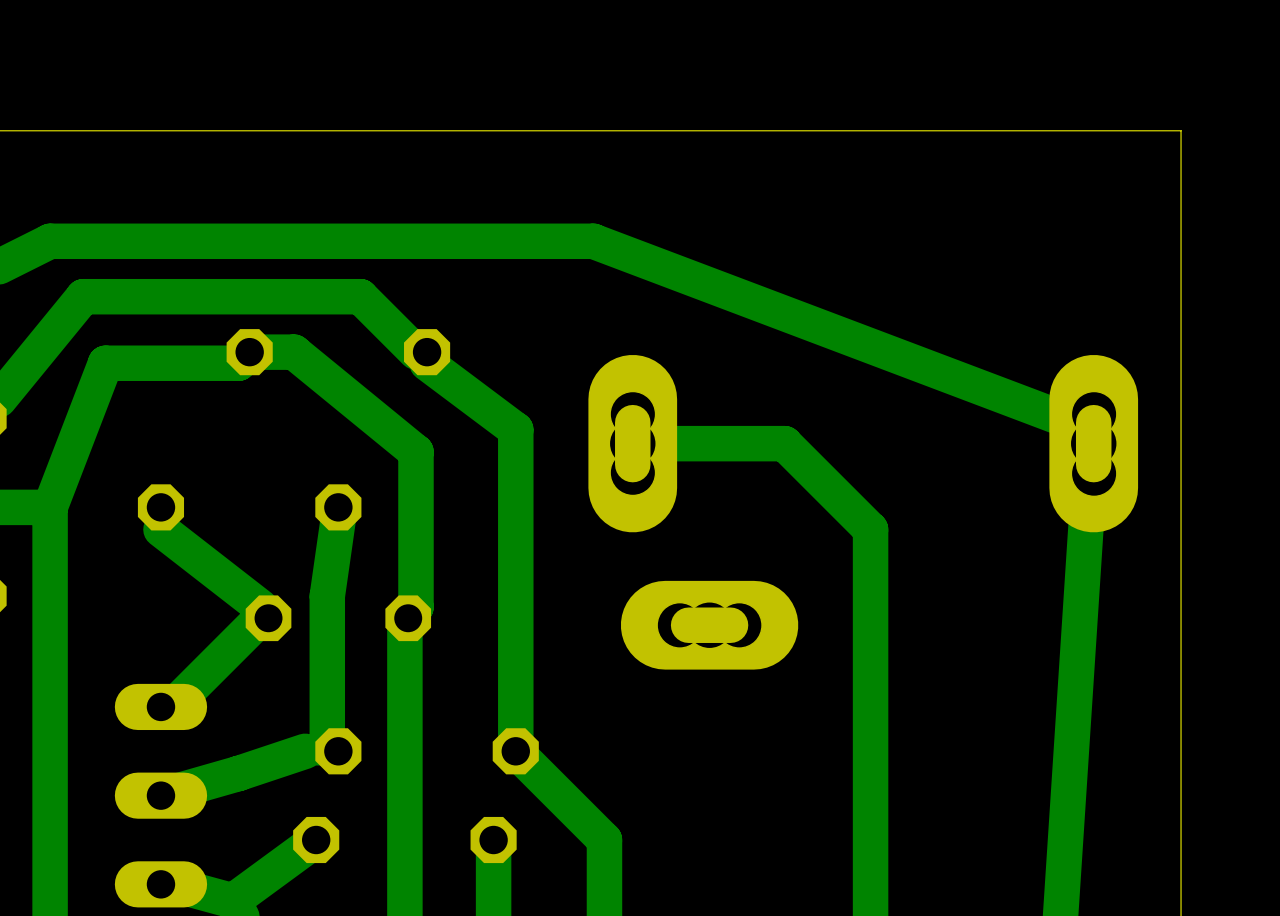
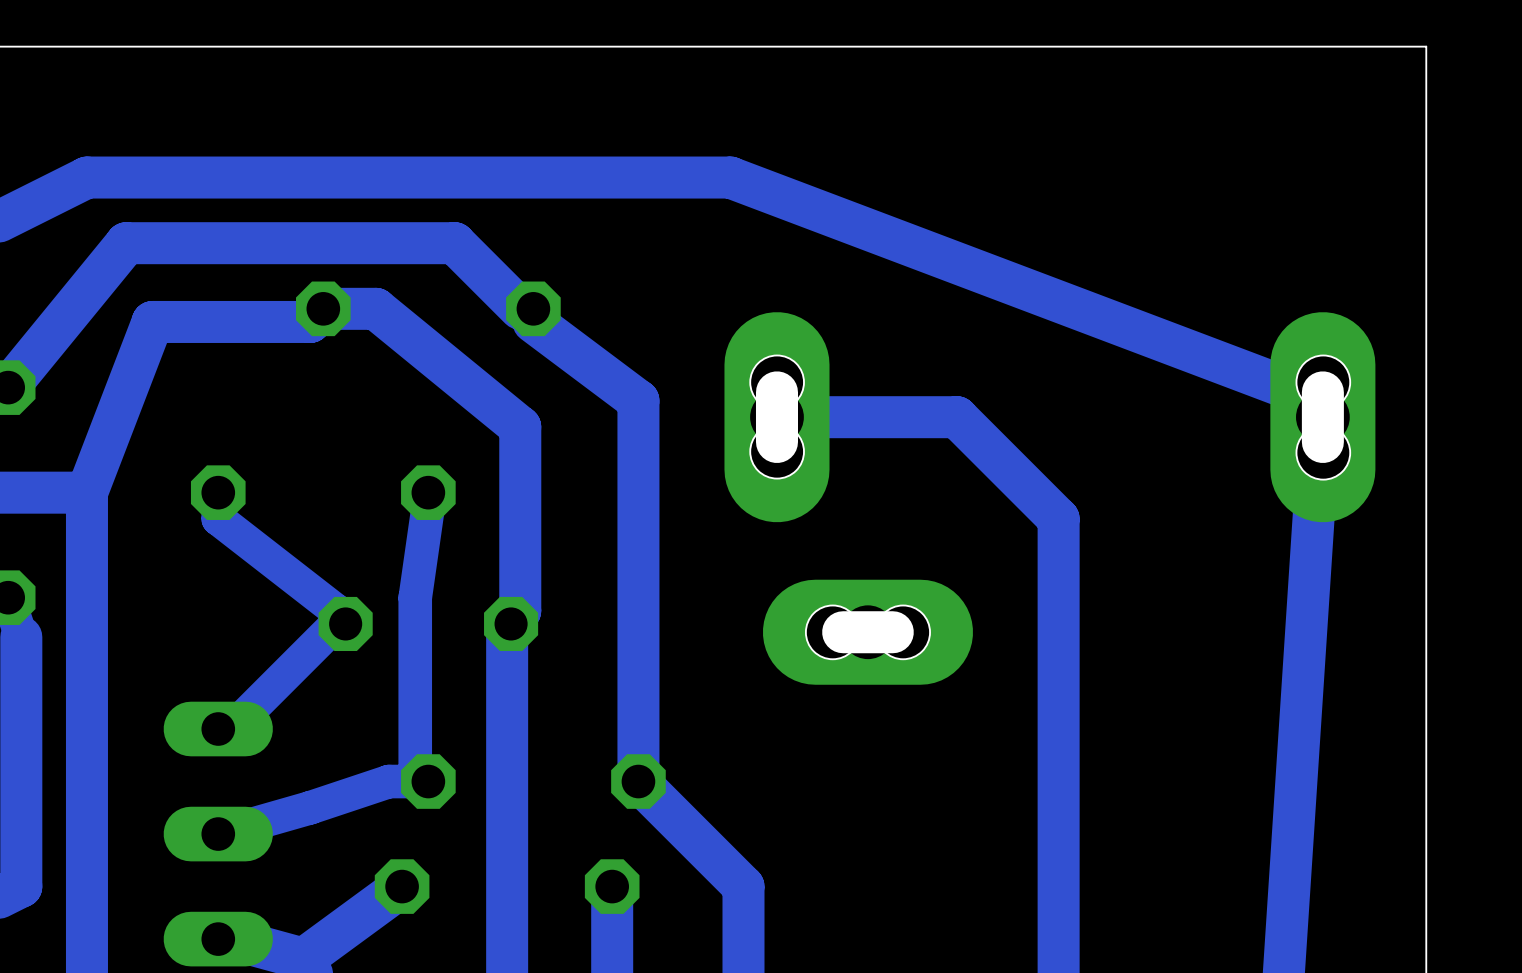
bottom track width: thick (338, 518) (327, 596) (327, 740) -> thin (428, 505) (415, 597) (415, 768)
bottom track width: thick (160, 529) (260, 607) -> thin (218, 518) (336, 610)
bottom track width: thick (260, 618) (172, 706) -> thin (336, 623) (231, 729)
bottom track width: thick (305, 751) (238, 773) (160, 795) -> thin (388, 781) (310, 807) (218, 834)

